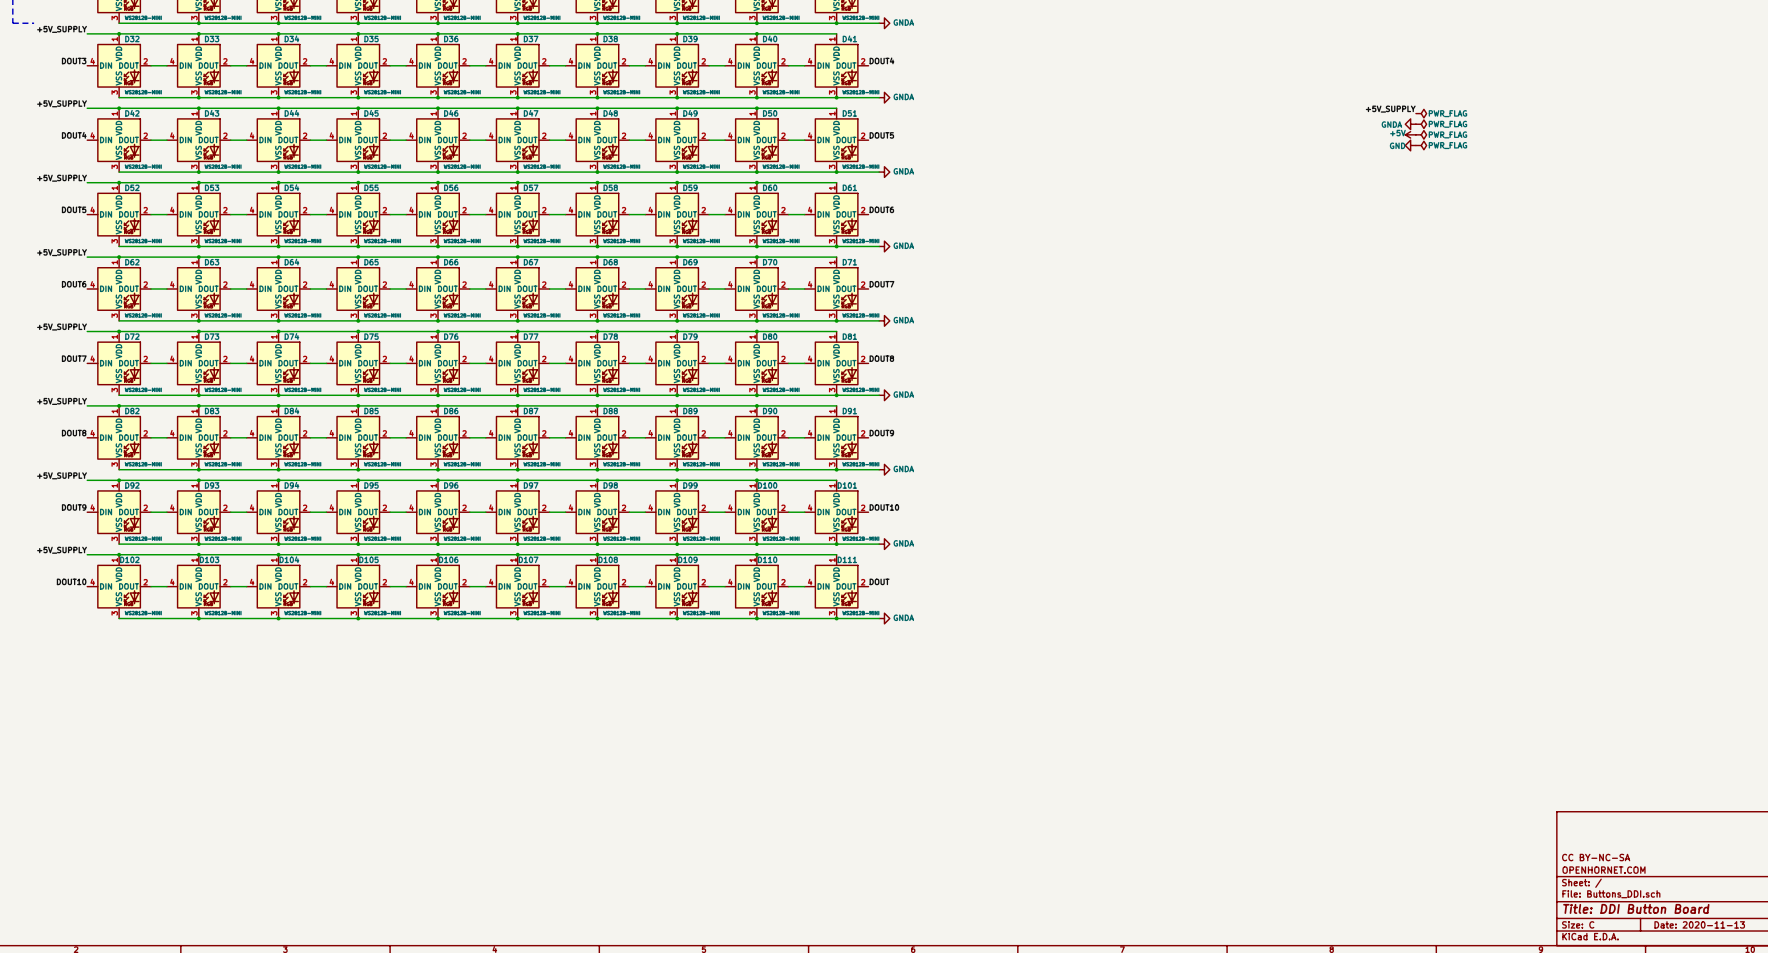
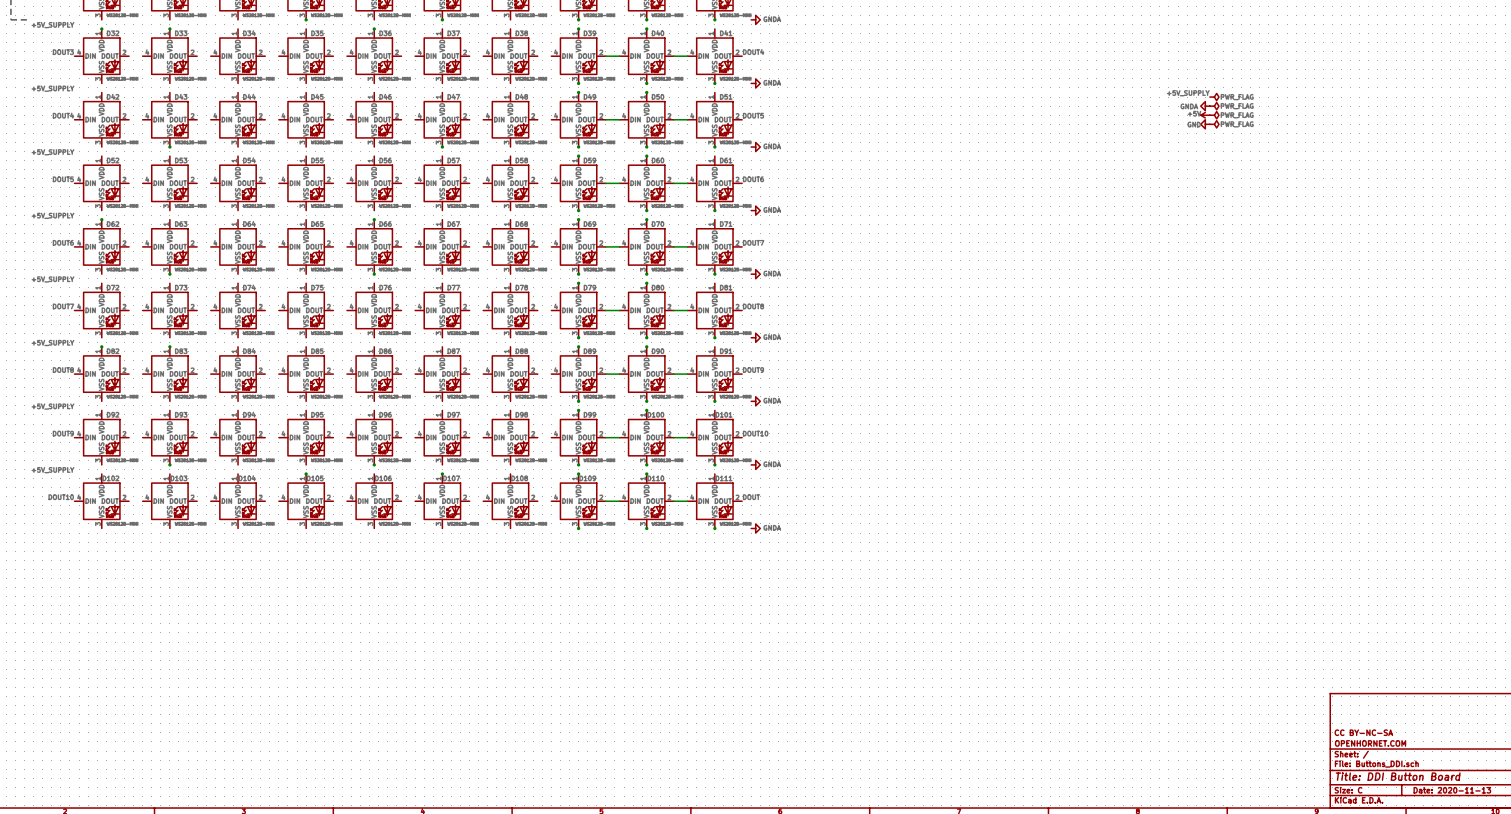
wire: (119, 23) (879, 23) -> none
junction: (198, 23) -> none
junction: (278, 23) -> none
junction: (438, 23) -> none
junction: (597, 23) -> none
wire: (87, 33) (836, 33) -> none
junction: (278, 33) -> none
junction: (358, 33) -> none
junction: (517, 33) -> none
junction: (597, 33) -> none
wire: (151, 65) (166, 65) -> none
wire: (230, 65) (246, 65) -> none
wire: (310, 65) (326, 65) -> none
wire: (390, 65) (406, 65) -> none
wire: (469, 65) (485, 65) -> none
wire: (549, 65) (565, 65) -> none
wire: (629, 65) (645, 65) -> none
wire: (119, 97) (879, 97) -> none
junction: (198, 97) -> none
junction: (278, 97) -> none
junction: (358, 97) -> none
junction: (438, 97) -> none
junction: (517, 97) -> none
junction: (597, 97) -> none
wire: (87, 108) (836, 108) -> none
junction: (119, 108) -> none
junction: (198, 108) -> none
junction: (278, 108) -> none
junction: (358, 108) -> none
junction: (438, 108) -> none
junction: (517, 108) -> none
junction: (597, 108) -> none
wire: (151, 140) (166, 140) -> none
wire: (230, 140) (246, 140) -> none
wire: (310, 140) (326, 140) -> none
wire: (390, 140) (406, 140) -> none
wire: (469, 140) (485, 140) -> none
wire: (549, 140) (565, 140) -> none
wire: (629, 140) (645, 140) -> none
wire: (119, 172) (879, 172) -> none
junction: (278, 172) -> none
junction: (358, 172) -> none
junction: (438, 172) -> none
junction: (597, 172) -> none
wire: (87, 182) (836, 182) -> none
junction: (119, 182) -> none
junction: (198, 182) -> none
junction: (278, 182) -> none
junction: (358, 182) -> none
junction: (438, 182) -> none
junction: (517, 182) -> none
junction: (597, 182) -> none
wire: (151, 214) (166, 214) -> none
wire: (230, 214) (246, 214) -> none
wire: (310, 214) (326, 214) -> none
wire: (390, 214) (406, 214) -> none
wire: (469, 214) (485, 214) -> none
wire: (549, 214) (565, 214) -> none
wire: (629, 214) (645, 214) -> none
wire: (119, 246) (879, 246) -> none
junction: (198, 246) -> none
junction: (278, 246) -> none
junction: (358, 246) -> none
junction: (438, 246) -> none
junction: (517, 246) -> none
junction: (597, 246) -> none
wire: (87, 257) (836, 257) -> none
junction: (198, 257) -> none
junction: (278, 257) -> none
junction: (358, 257) -> none
junction: (517, 257) -> none
junction: (597, 257) -> none
wire: (151, 288) (166, 288) -> none
wire: (230, 288) (246, 288) -> none
wire: (310, 288) (326, 288) -> none
wire: (390, 288) (406, 288) -> none
wire: (469, 288) (485, 288) -> none
wire: (549, 288) (565, 288) -> none
wire: (629, 288) (645, 288) -> none
wire: (119, 320) (879, 320) -> none
junction: (278, 320) -> none
junction: (358, 320) -> none
junction: (517, 320) -> none
junction: (597, 320) -> none
wire: (87, 331) (836, 331) -> none
junction: (119, 331) -> none
junction: (198, 331) -> none
junction: (278, 331) -> none
junction: (358, 331) -> none
junction: (438, 331) -> none
junction: (517, 331) -> none
junction: (597, 331) -> none
wire: (151, 363) (166, 363) -> none
wire: (230, 363) (246, 363) -> none
wire: (310, 363) (326, 363) -> none
wire: (390, 363) (406, 363) -> none
wire: (469, 363) (485, 363) -> none
wire: (549, 363) (565, 363) -> none
wire: (629, 363) (645, 363) -> none
wire: (119, 395) (879, 395) -> none
junction: (198, 395) -> none
junction: (278, 395) -> none
junction: (358, 395) -> none
junction: (438, 395) -> none
junction: (517, 395) -> none
junction: (597, 395) -> none
wire: (87, 405) (836, 405) -> none
junction: (278, 405) -> none
junction: (358, 405) -> none
junction: (438, 405) -> none
junction: (517, 405) -> none
junction: (597, 405) -> none
wire: (151, 437) (166, 437) -> none
wire: (230, 437) (246, 437) -> none
wire: (310, 437) (326, 437) -> none
wire: (390, 437) (406, 437) -> none
wire: (469, 437) (485, 437) -> none
wire: (549, 437) (565, 437) -> none
wire: (629, 437) (645, 437) -> none
wire: (119, 469) (879, 469) -> none
junction: (198, 469) -> none
junction: (278, 469) -> none
junction: (358, 469) -> none
junction: (438, 469) -> none
junction: (517, 469) -> none
junction: (597, 469) -> none
wire: (87, 480) (836, 480) -> none
junction: (119, 480) -> none
junction: (198, 480) -> none
junction: (278, 480) -> none
junction: (358, 480) -> none
junction: (438, 480) -> none
junction: (517, 480) -> none
junction: (597, 480) -> none
wire: (151, 512) (166, 512) -> none
wire: (230, 512) (246, 512) -> none
wire: (310, 512) (326, 512) -> none
wire: (390, 512) (406, 512) -> none
wire: (469, 512) (485, 512) -> none
wire: (549, 512) (565, 512) -> none
wire: (629, 512) (645, 512) -> none
wire: (119, 544) (879, 544) -> none
junction: (278, 544) -> none
junction: (358, 544) -> none
junction: (517, 544) -> none
junction: (597, 544) -> none
wire: (87, 554) (836, 554) -> none
junction: (119, 554) -> none
junction: (198, 554) -> none
junction: (278, 554) -> none
junction: (438, 554) -> none
junction: (597, 554) -> none
wire: (151, 586) (166, 586) -> none
wire: (230, 586) (246, 586) -> none
wire: (310, 586) (326, 586) -> none
wire: (390, 586) (406, 586) -> none
wire: (469, 586) (485, 586) -> none
wire: (549, 586) (565, 586) -> none
wire: (629, 586) (645, 586) -> none
wire: (119, 618) (879, 618) -> none
junction: (198, 618) -> none
junction: (278, 618) -> none
junction: (358, 618) -> none
junction: (438, 618) -> none
junction: (517, 618) -> none
junction: (597, 618) -> none

